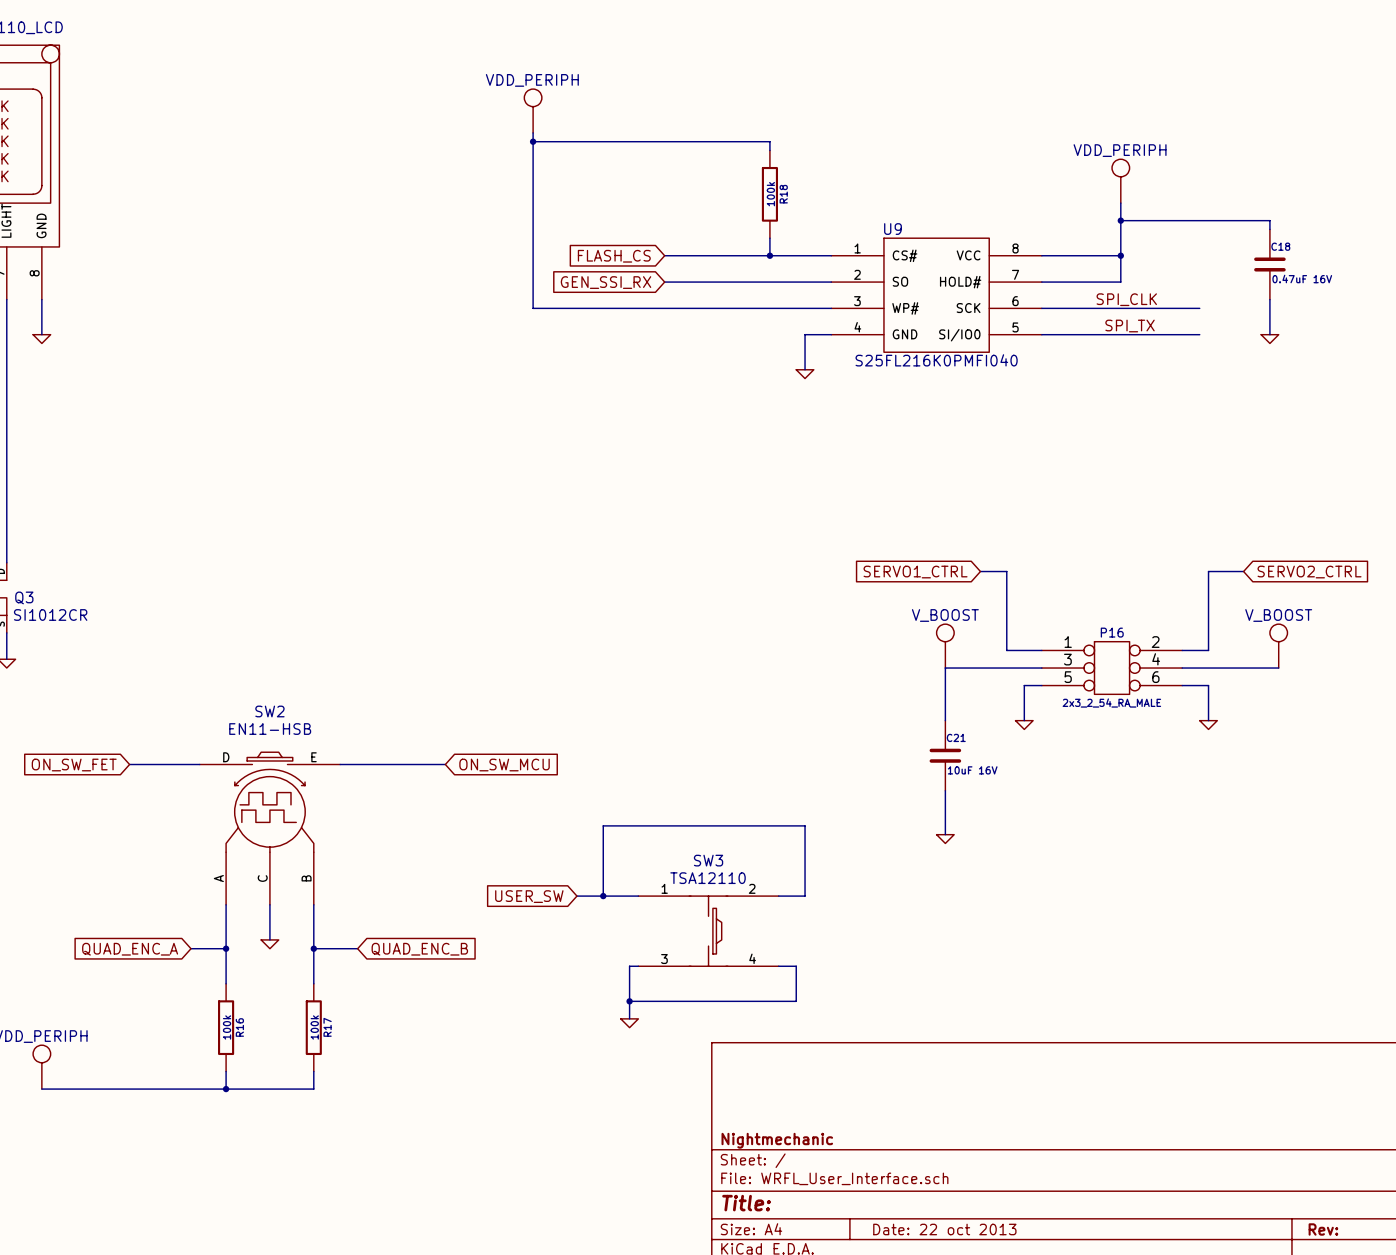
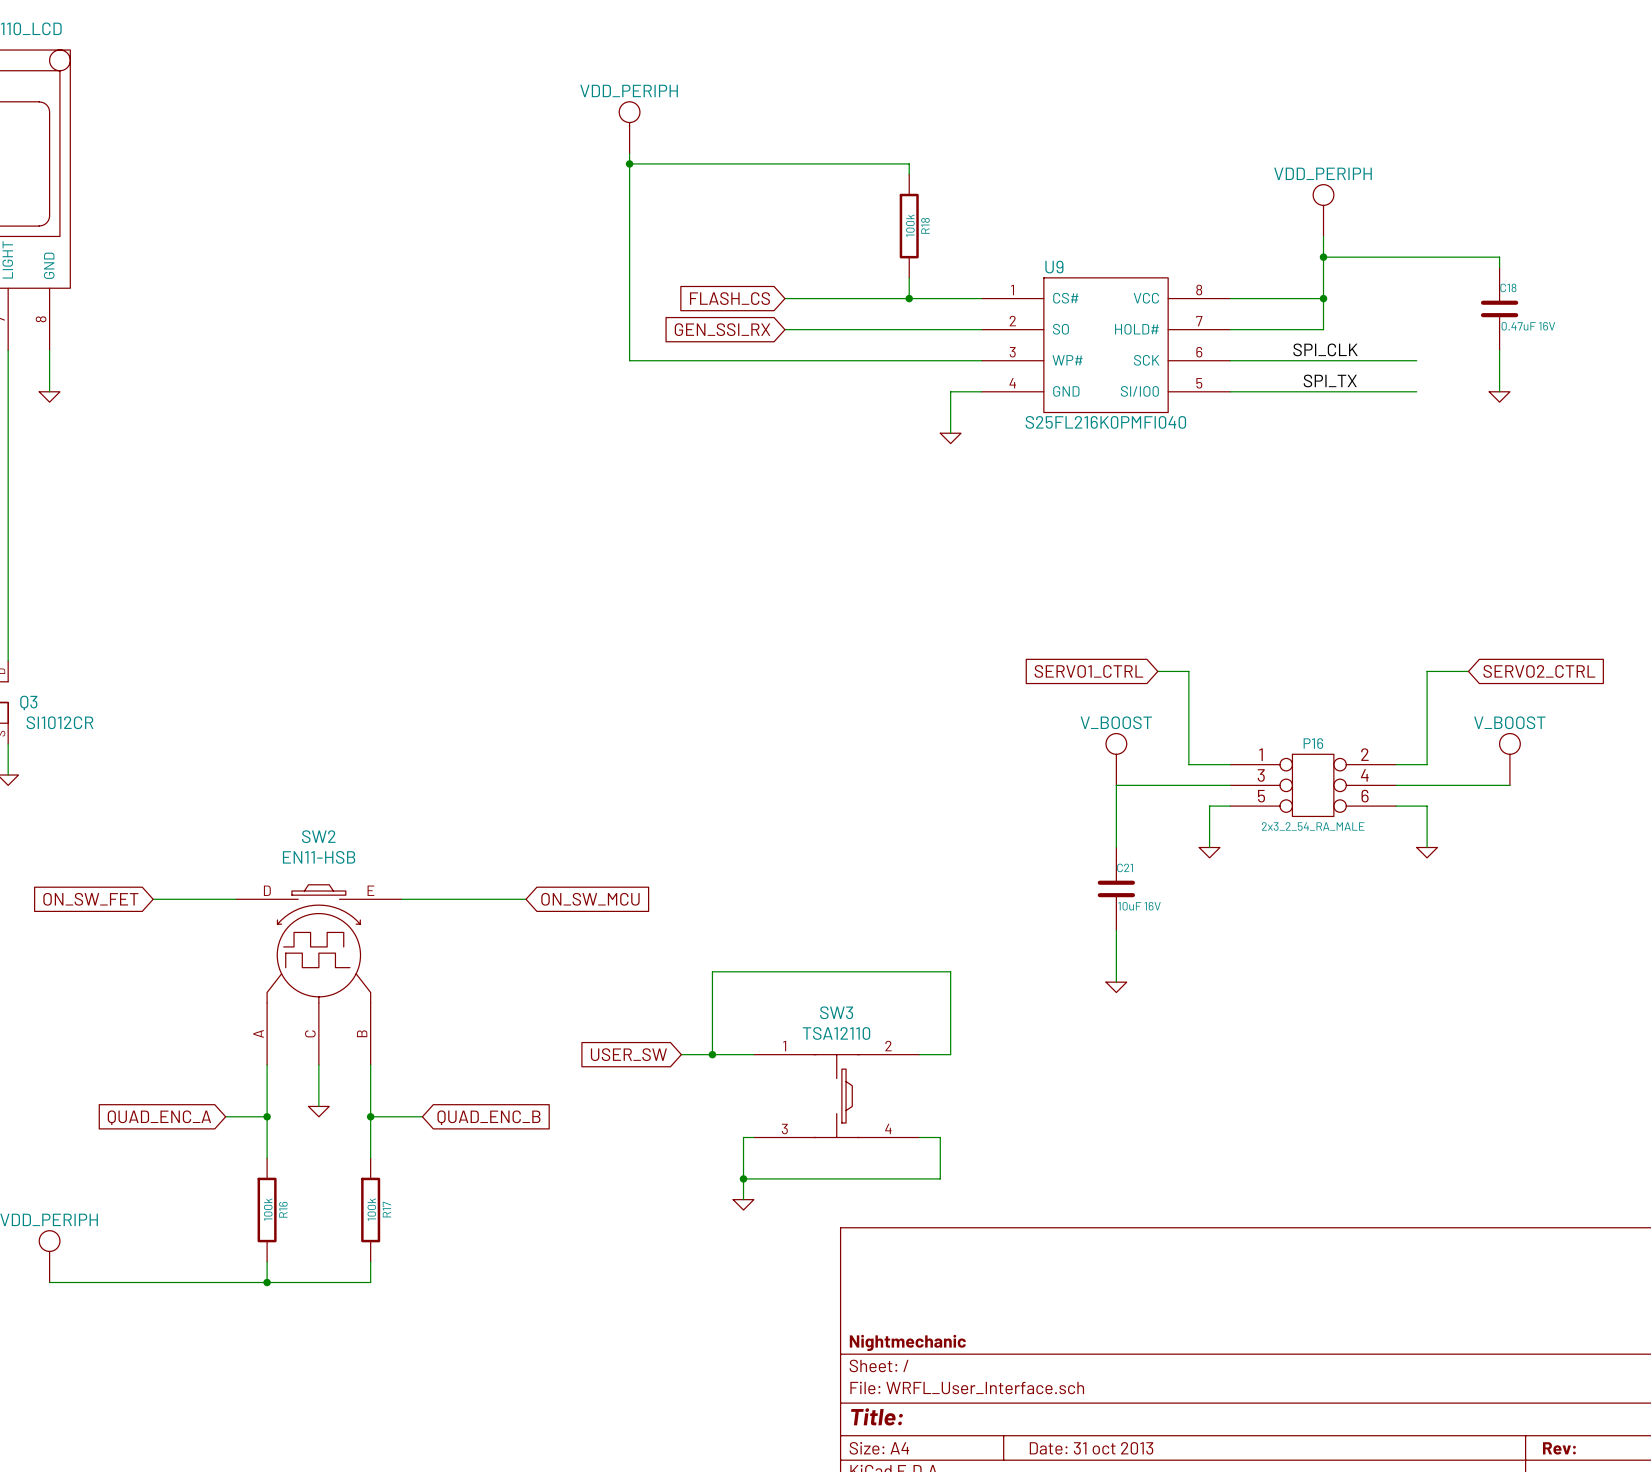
title block: Date: 22 oct 2013 (944, 1229) -> Date: 31 oct 2013 (1091, 1448)

